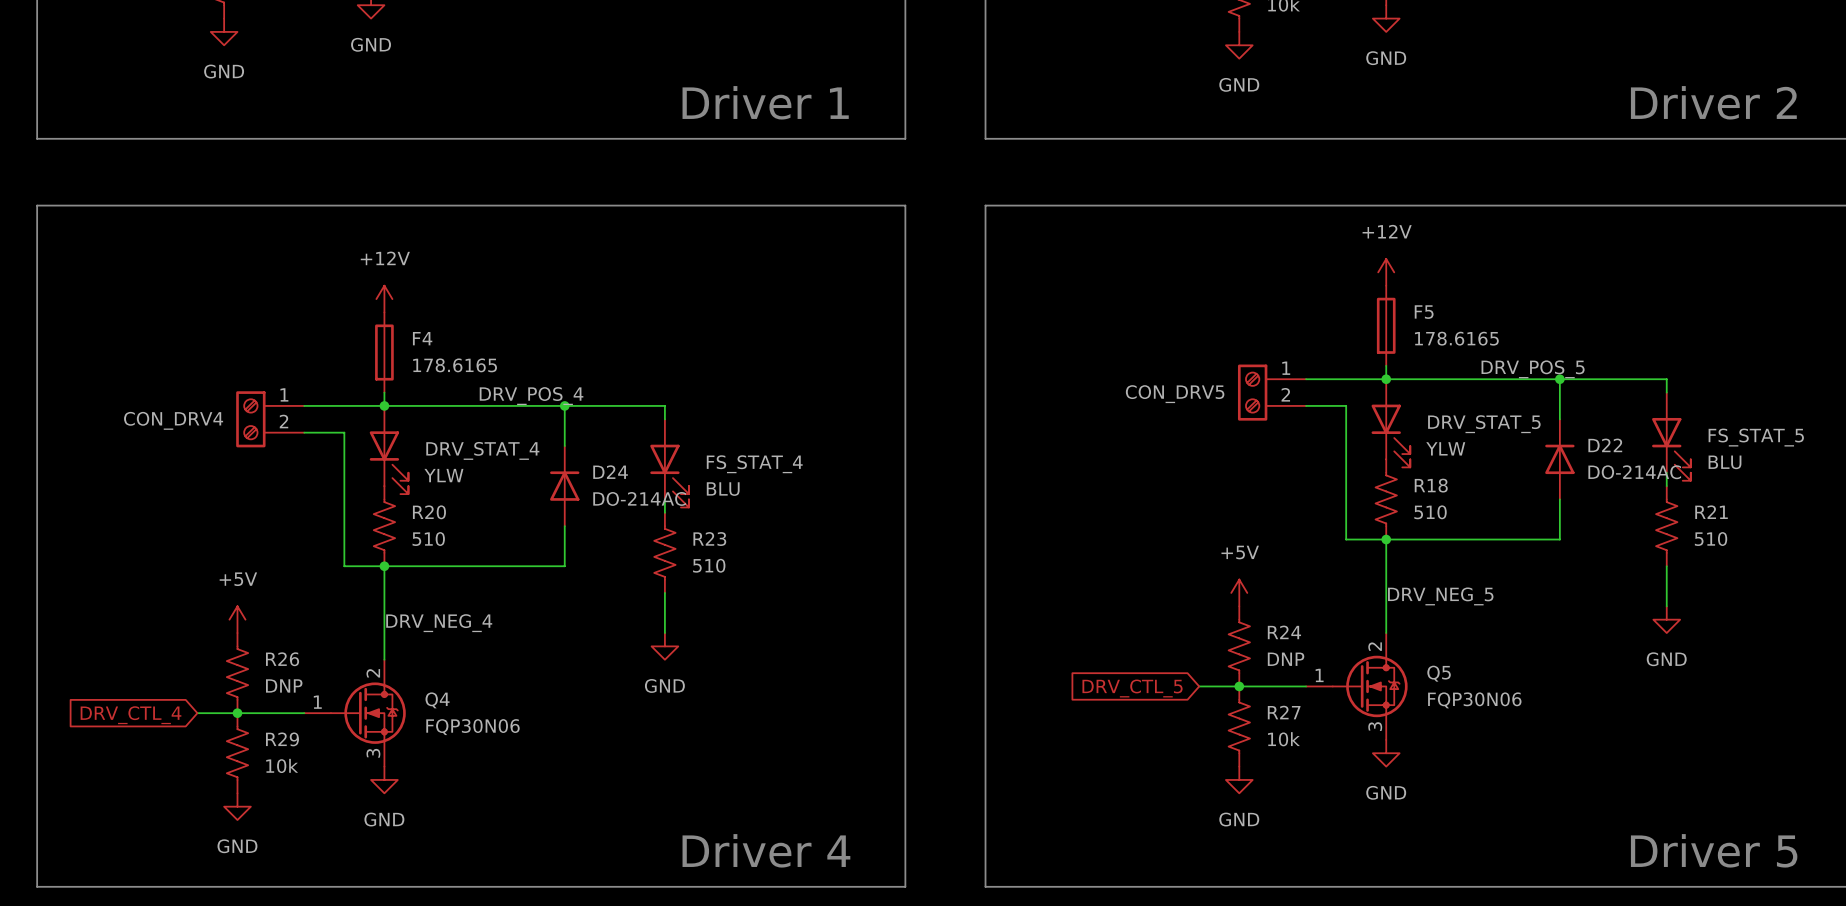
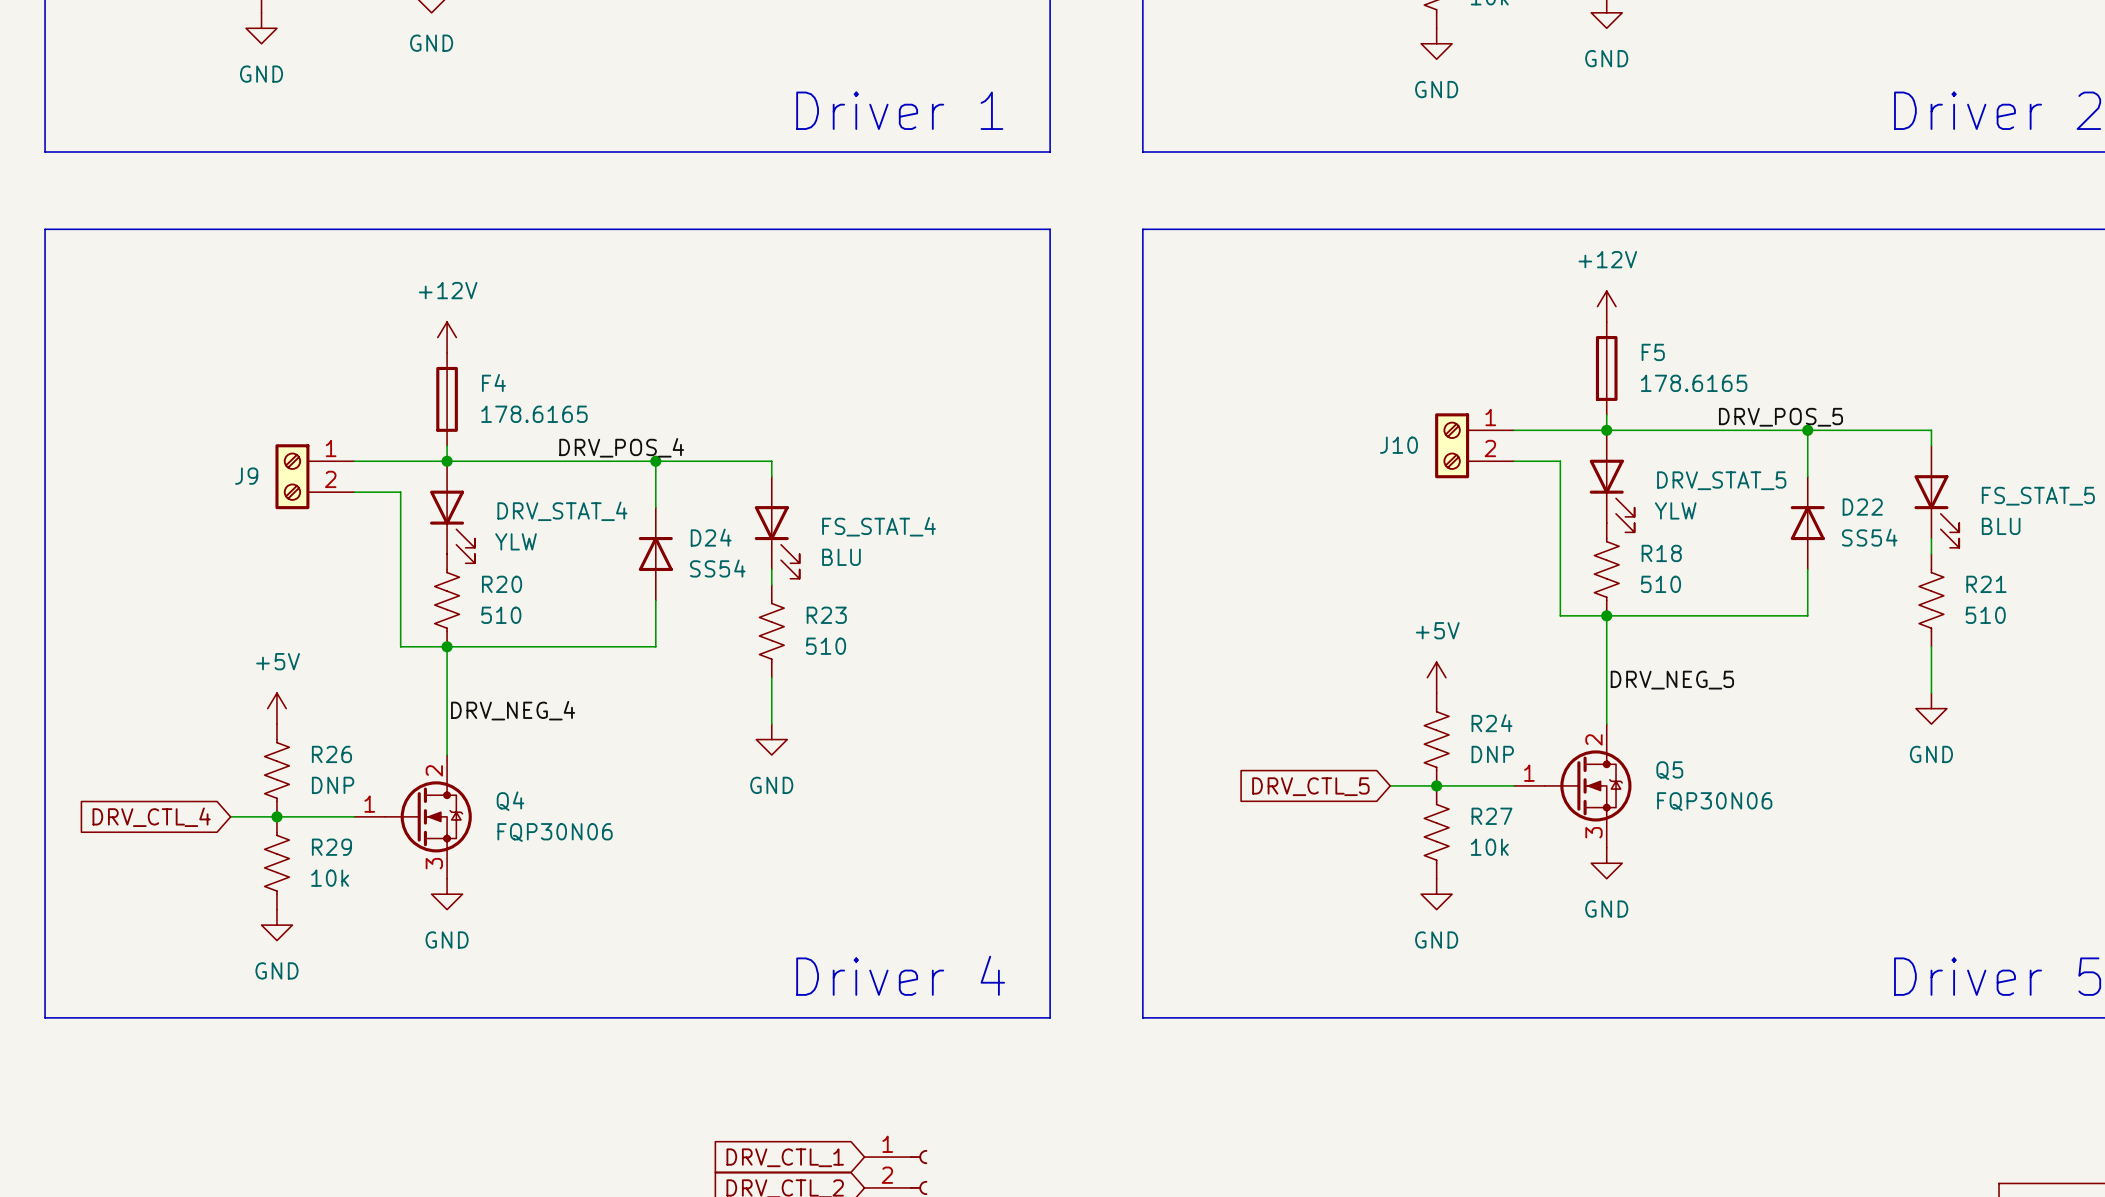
CON_DRV5 name: CON_DRV5 (1175, 394) -> J10 (1398, 445)
CON_DRV4 name: CON_DRV4 (173, 420) -> J9 (246, 476)
D22 value: DO-214AC (1634, 472) -> SS54 (1869, 537)
D24 value: DO-214AC (639, 498) -> SS54 (717, 568)

